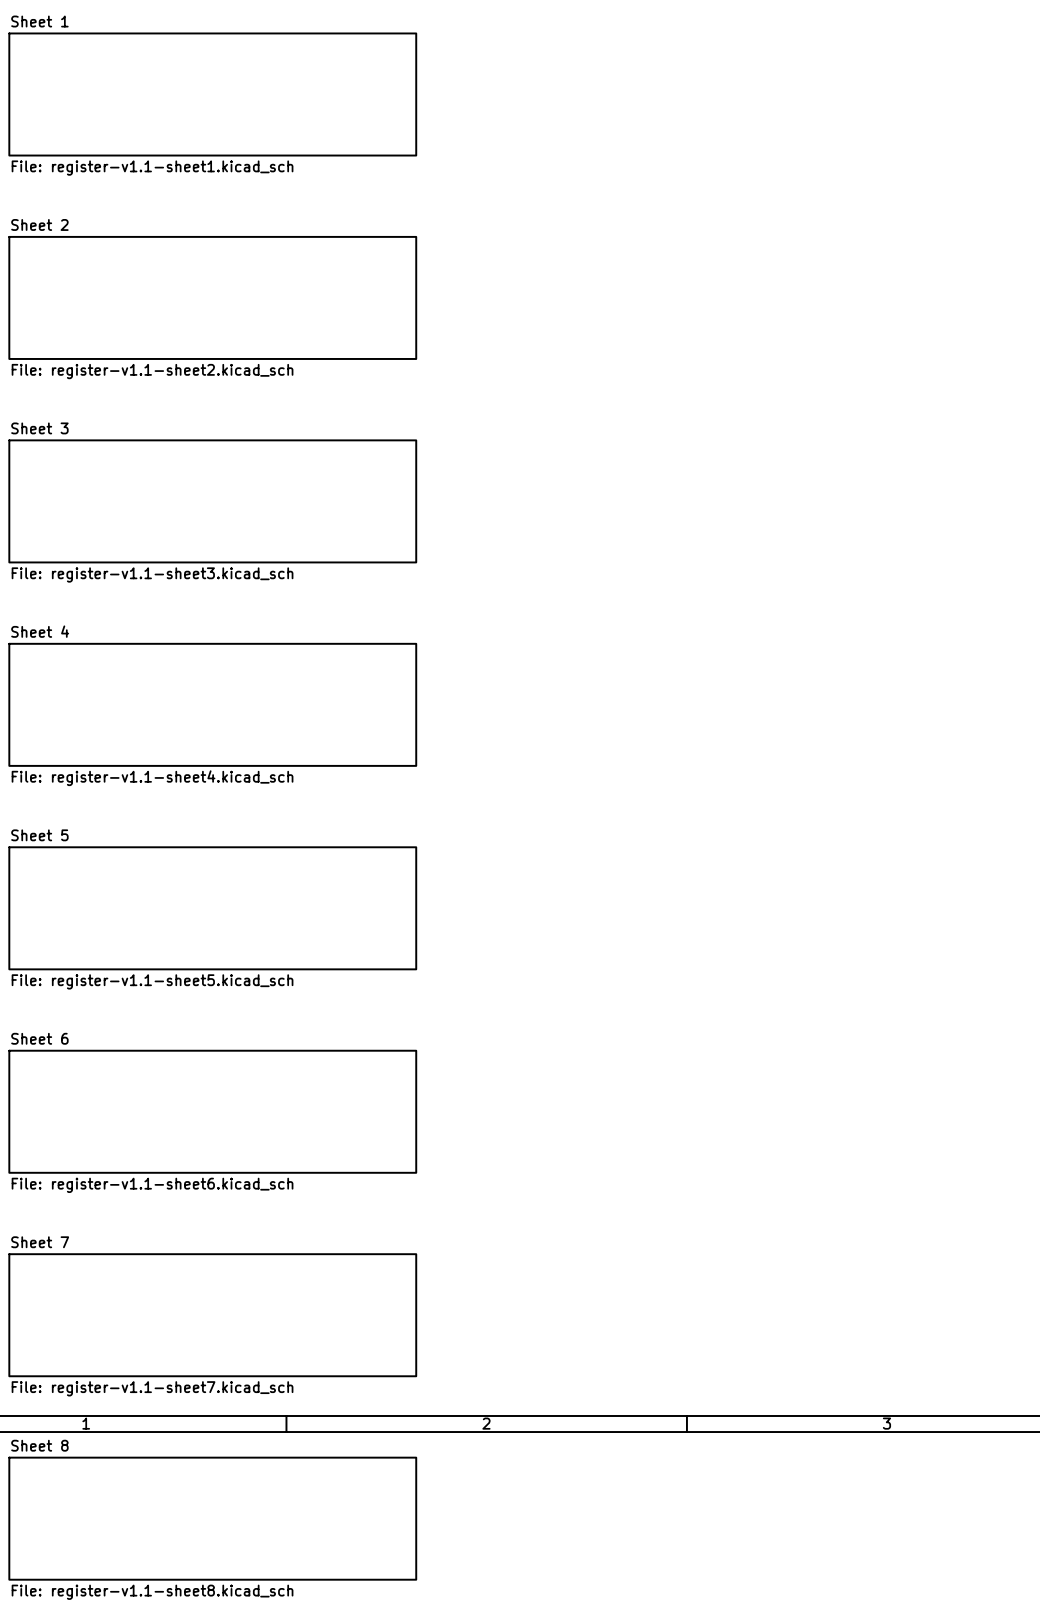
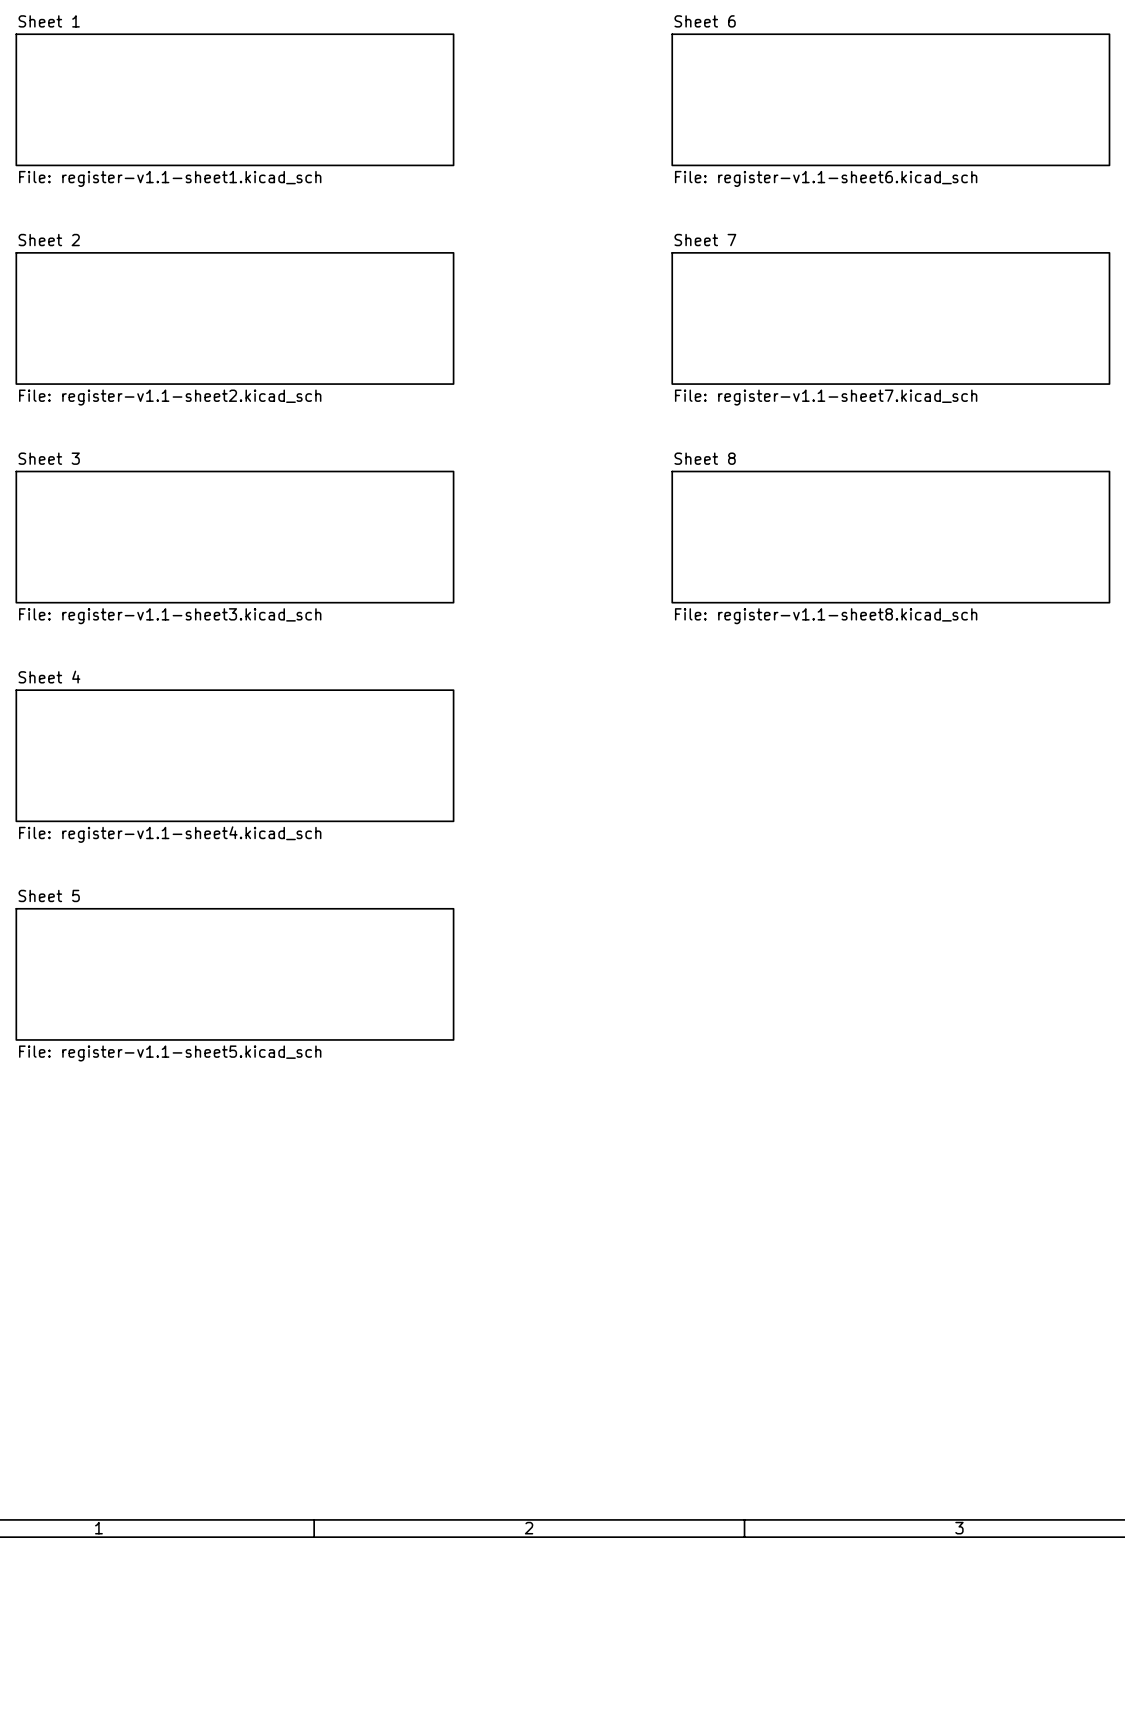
sheet Sheet 6 position: (212, 1111) -> (890, 99)
sheet Sheet 7 position: (212, 1315) -> (890, 318)
sheet Sheet 8 position: (212, 1518) -> (890, 537)

